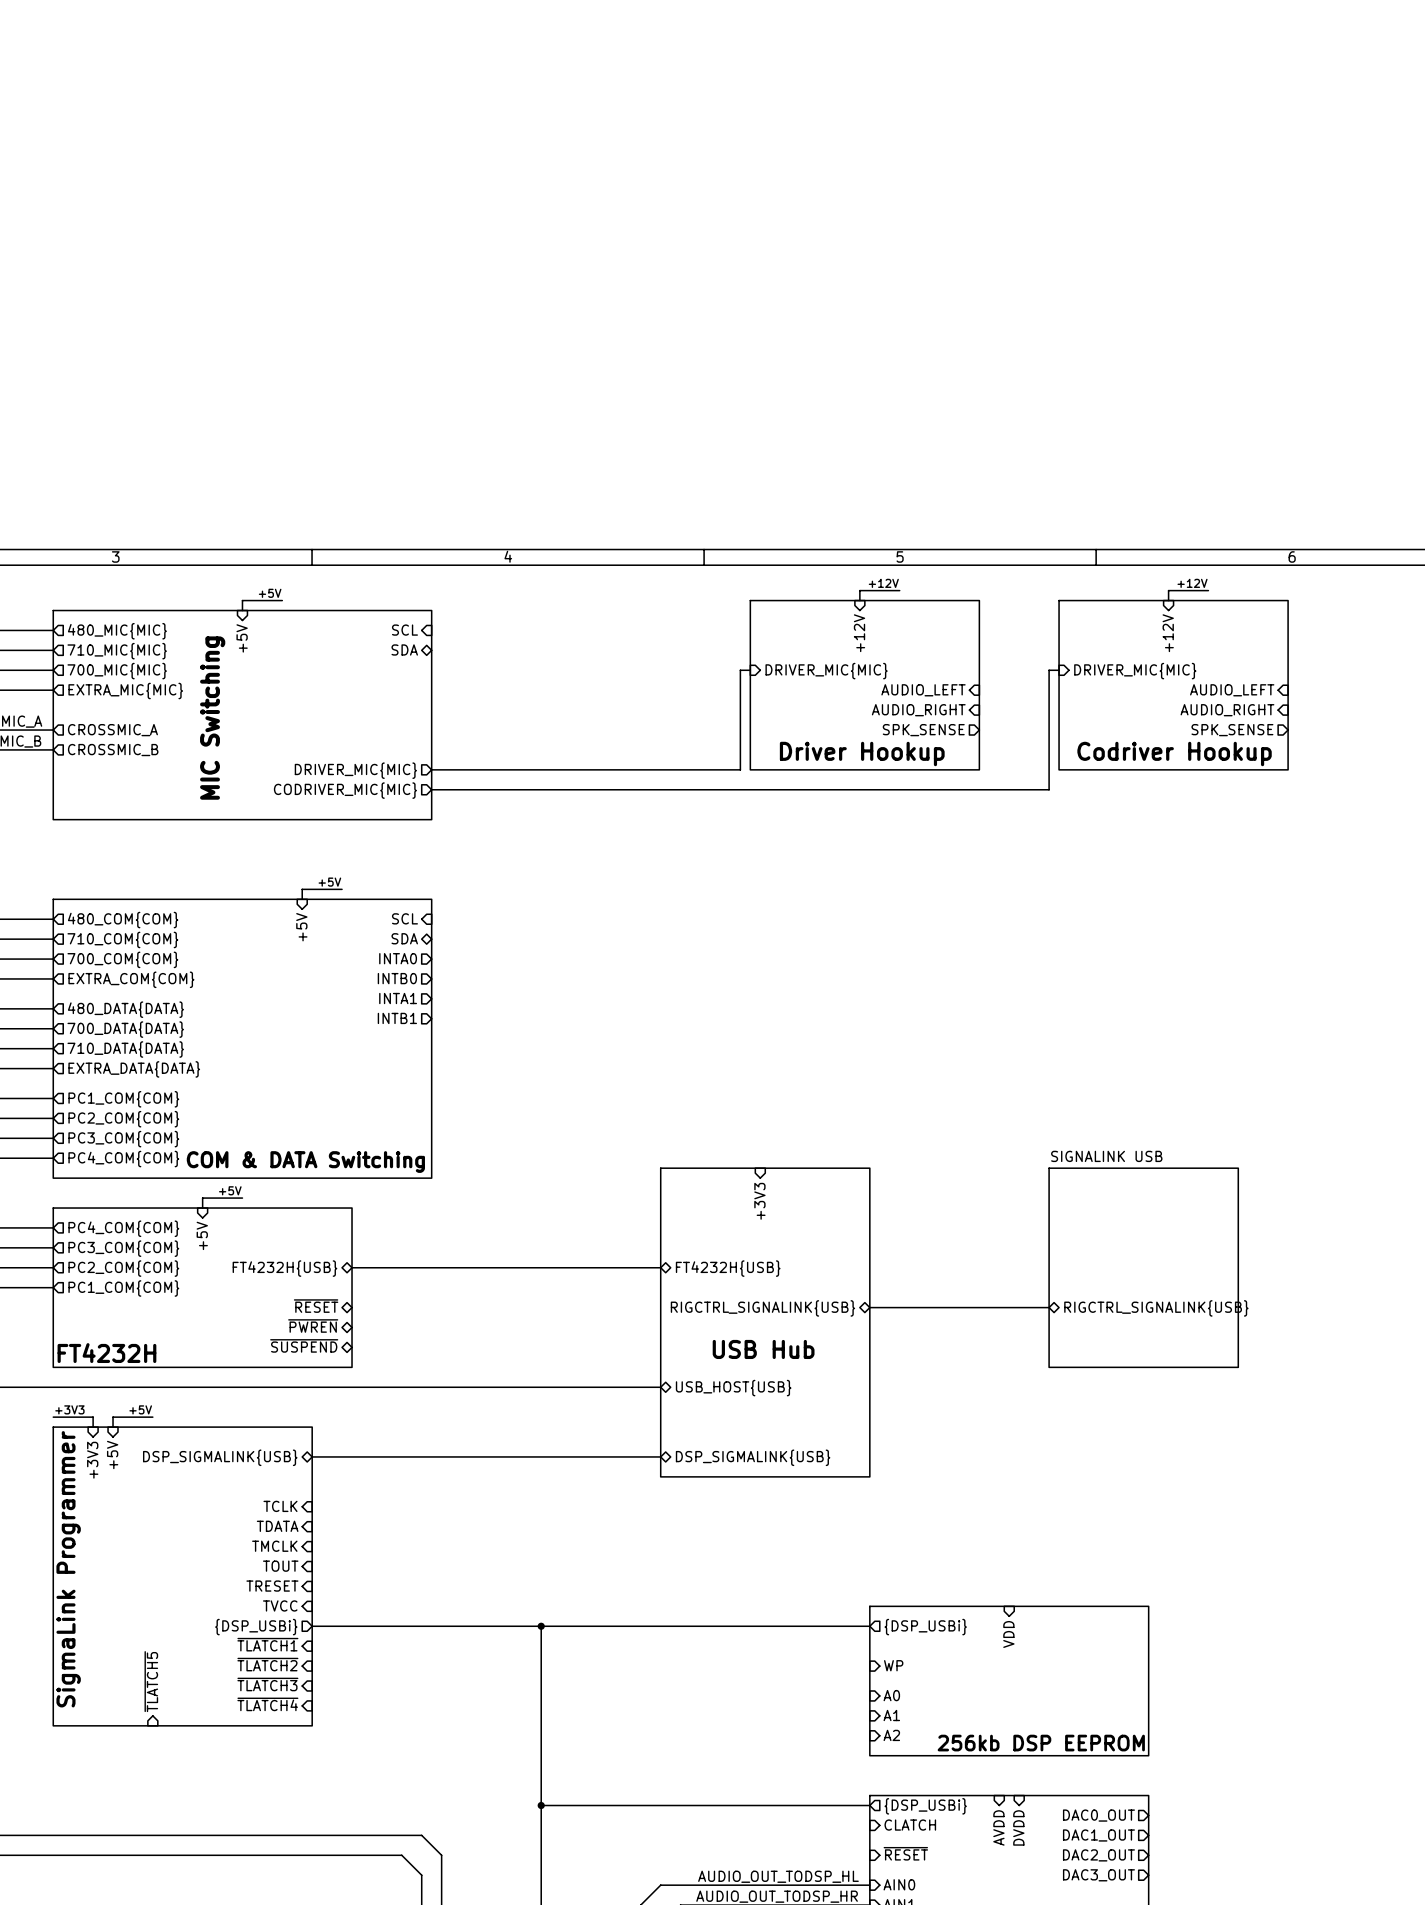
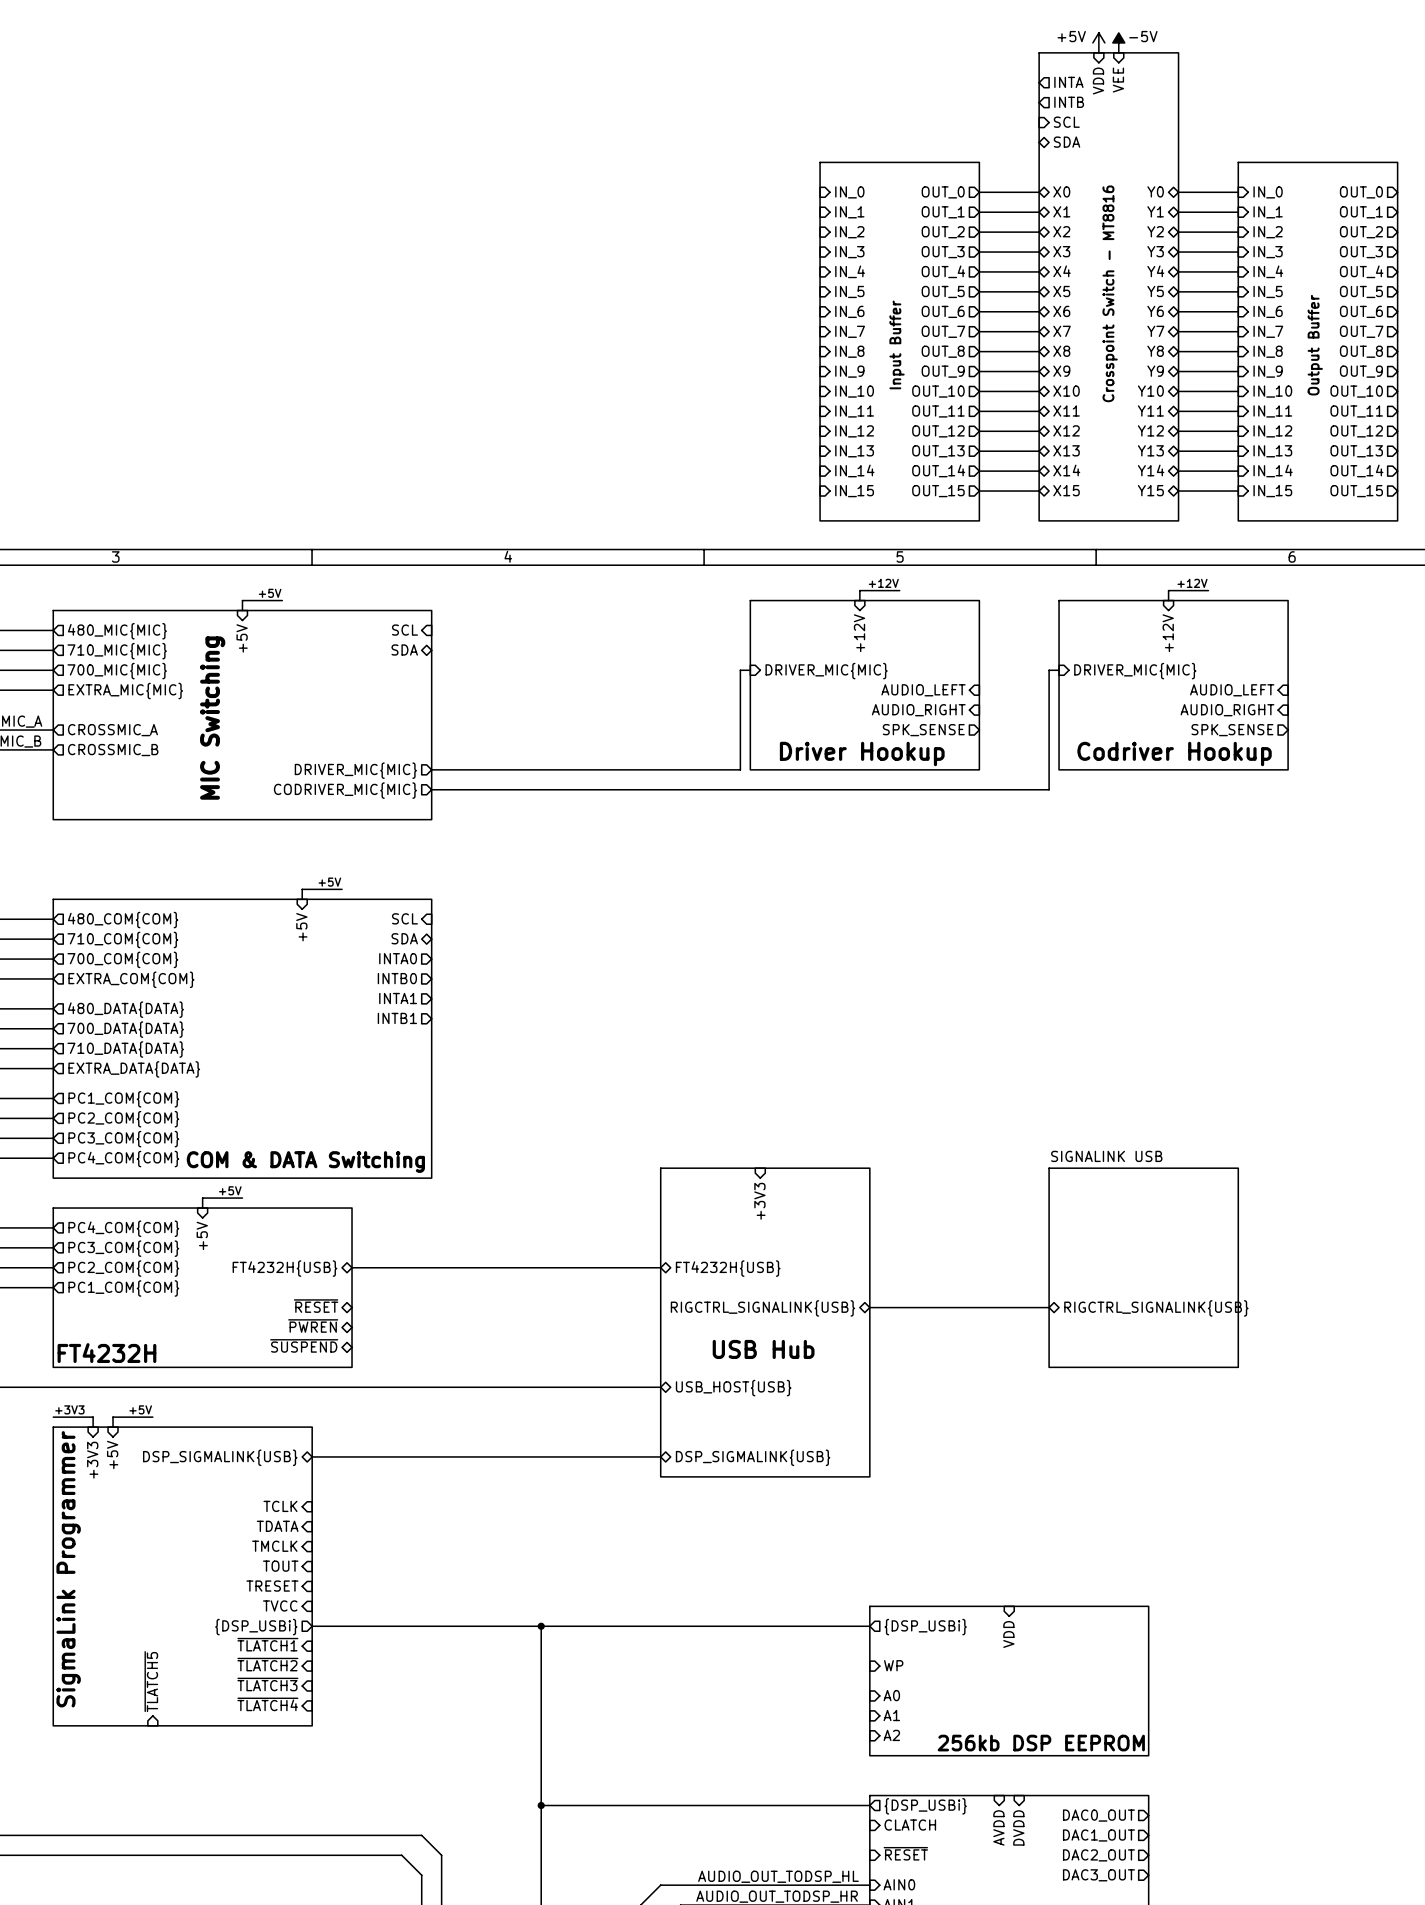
power symbol: none -> +5V (1098, 42)
power symbol: none -> -5V (1118, 42)
sheet pin: none -> VEE (1118, 80)
sheet pin: none -> VDD (1098, 81)
sheet pin: none -> INTA (1068, 82)
sheet pin: none -> INTB (1069, 102)
sheet pin: none -> SCL (1066, 122)
sheet pin: none -> SDA (1067, 142)
sheet pin: none -> X0 (1061, 191)
sheet pin: none -> Y0 (1155, 191)
sheet pin: none -> IN_0 (849, 192)
sheet pin: none -> OUT_0 (943, 192)
wire: none -> (979, 192) (1039, 192)
wire: none -> (1178, 192) (1238, 192)
sheet pin: none -> IN_0 (1268, 192)
sheet pin: none -> OUT_0 (1361, 192)
sheet pin: none -> X1 (1061, 211)
sheet pin: none -> Y1 (1155, 211)
sheet pin: none -> IN_1 (849, 212)
sheet pin: none -> OUT_1 (943, 212)
wire: none -> (979, 212) (1039, 212)
wire: none -> (1178, 212) (1238, 212)
sheet pin: none -> IN_1 (1268, 212)
sheet pin: none -> OUT_1 (1361, 212)
sheet pin: none -> X2 (1061, 231)
sheet pin: none -> Y2 (1155, 231)
sheet pin: none -> IN_2 (849, 232)
sheet pin: none -> OUT_2 (943, 232)
wire: none -> (979, 232) (1039, 232)
wire: none -> (1178, 232) (1238, 232)
sheet pin: none -> IN_2 (1268, 232)
sheet pin: none -> OUT_2 (1361, 232)
sheet pin: none -> X3 (1061, 251)
sheet pin: none -> Y3 (1155, 251)
sheet pin: none -> IN_3 (849, 252)
sheet pin: none -> OUT_3 (943, 252)
wire: none -> (979, 252) (1039, 252)
wire: none -> (1178, 252) (1238, 252)
sheet pin: none -> IN_3 (1268, 252)
sheet pin: none -> OUT_3 (1361, 252)
sheet pin: none -> IN_4 (850, 271)
sheet pin: none -> OUT_4 (943, 271)
wire: none -> (979, 271) (1039, 271)
sheet pin: none -> X4 (1062, 271)
sheet pin: none -> Y4 (1155, 271)
wire: none -> (1178, 271) (1238, 271)
sheet pin: none -> IN_4 (1268, 271)
sheet pin: none -> OUT_4 (1361, 271)
sheet Crosspoint Switch - MT8816: none -> (1108, 286)
sheet pin: none -> IN_5 (849, 291)
sheet pin: none -> OUT_5 (943, 291)
wire: none -> (979, 291) (1039, 291)
sheet pin: none -> X5 (1061, 291)
sheet pin: none -> Y5 (1155, 291)
wire: none -> (1178, 291) (1238, 291)
sheet pin: none -> IN_5 (1268, 291)
sheet pin: none -> OUT_5 (1361, 291)
sheet pin: none -> IN_6 (849, 311)
sheet pin: none -> OUT_6 (943, 311)
wire: none -> (979, 311) (1039, 311)
sheet pin: none -> X6 (1061, 311)
sheet pin: none -> Y6 (1155, 311)
wire: none -> (1178, 311) (1238, 311)
sheet pin: none -> IN_6 (1268, 311)
sheet pin: none -> OUT_6 (1361, 311)
sheet pin: none -> IN_7 (850, 331)
sheet pin: none -> OUT_7 (943, 331)
wire: none -> (979, 331) (1039, 331)
sheet pin: none -> X7 (1062, 331)
sheet pin: none -> Y7 (1155, 331)
wire: none -> (1178, 331) (1238, 331)
sheet pin: none -> IN_7 (1268, 331)
sheet pin: none -> OUT_7 (1361, 331)
sheet Input Buffer: none -> (899, 341)
sheet Output Buffer: none -> (1317, 341)
sheet pin: none -> IN_8 (849, 351)
sheet pin: none -> OUT_8 (943, 351)
wire: none -> (979, 351) (1039, 351)
sheet pin: none -> X8 (1061, 351)
sheet pin: none -> Y8 (1155, 351)
wire: none -> (1178, 351) (1238, 351)
sheet pin: none -> IN_8 (1268, 351)
sheet pin: none -> OUT_8 (1361, 351)
sheet pin: none -> IN_9 (849, 371)
sheet pin: none -> OUT_9 (943, 371)
wire: none -> (979, 371) (1039, 371)
sheet pin: none -> X9 (1061, 371)
sheet pin: none -> Y9 (1155, 371)
wire: none -> (1178, 371) (1238, 371)
sheet pin: none -> IN_9 (1268, 371)
sheet pin: none -> OUT_9 (1361, 371)
sheet pin: none -> IN_10 (854, 391)
sheet pin: none -> OUT_10 (938, 391)
wire: none -> (979, 391) (1039, 391)
sheet pin: none -> X10 (1066, 391)
sheet pin: none -> Y10 (1150, 391)
wire: none -> (1178, 391) (1238, 391)
sheet pin: none -> IN_10 (1272, 391)
sheet pin: none -> OUT_10 (1356, 391)
sheet pin: none -> X11 (1066, 410)
sheet pin: none -> Y11 (1150, 410)
sheet pin: none -> IN_11 (854, 411)
sheet pin: none -> OUT_11 (938, 411)
wire: none -> (979, 411) (1039, 411)
wire: none -> (1178, 411) (1238, 411)
sheet pin: none -> IN_11 (1272, 411)
sheet pin: none -> OUT_11 (1356, 411)
sheet pin: none -> X12 (1066, 430)
sheet pin: none -> Y12 (1150, 430)
sheet pin: none -> IN_12 (854, 431)
sheet pin: none -> OUT_12 (938, 431)
wire: none -> (979, 431) (1039, 431)
wire: none -> (1178, 431) (1238, 431)
sheet pin: none -> IN_12 (1272, 431)
sheet pin: none -> OUT_12 (1356, 431)
sheet pin: none -> X13 (1066, 450)
sheet pin: none -> Y13 (1150, 450)
sheet pin: none -> IN_13 (854, 451)
sheet pin: none -> OUT_13 (938, 451)
wire: none -> (979, 451) (1039, 451)
wire: none -> (1178, 451) (1238, 451)
sheet pin: none -> IN_13 (1272, 451)
sheet pin: none -> OUT_13 (1356, 451)
sheet pin: none -> IN_14 (854, 470)
sheet pin: none -> OUT_14 (938, 470)
sheet pin: none -> X14 (1066, 470)
sheet pin: none -> Y14 (1151, 470)
sheet pin: none -> IN_14 (1273, 470)
sheet pin: none -> OUT_14 (1356, 470)
wire: none -> (979, 471) (1039, 471)
wire: none -> (1178, 471) (1238, 471)
sheet pin: none -> X15 (1066, 490)
sheet pin: none -> Y15 (1150, 490)
sheet pin: none -> IN_15 (854, 491)
sheet pin: none -> OUT_15 (938, 491)
wire: none -> (979, 491) (1039, 491)
wire: none -> (1178, 491) (1238, 491)
sheet pin: none -> IN_15 (1272, 491)
sheet pin: none -> OUT_15 (1356, 491)

